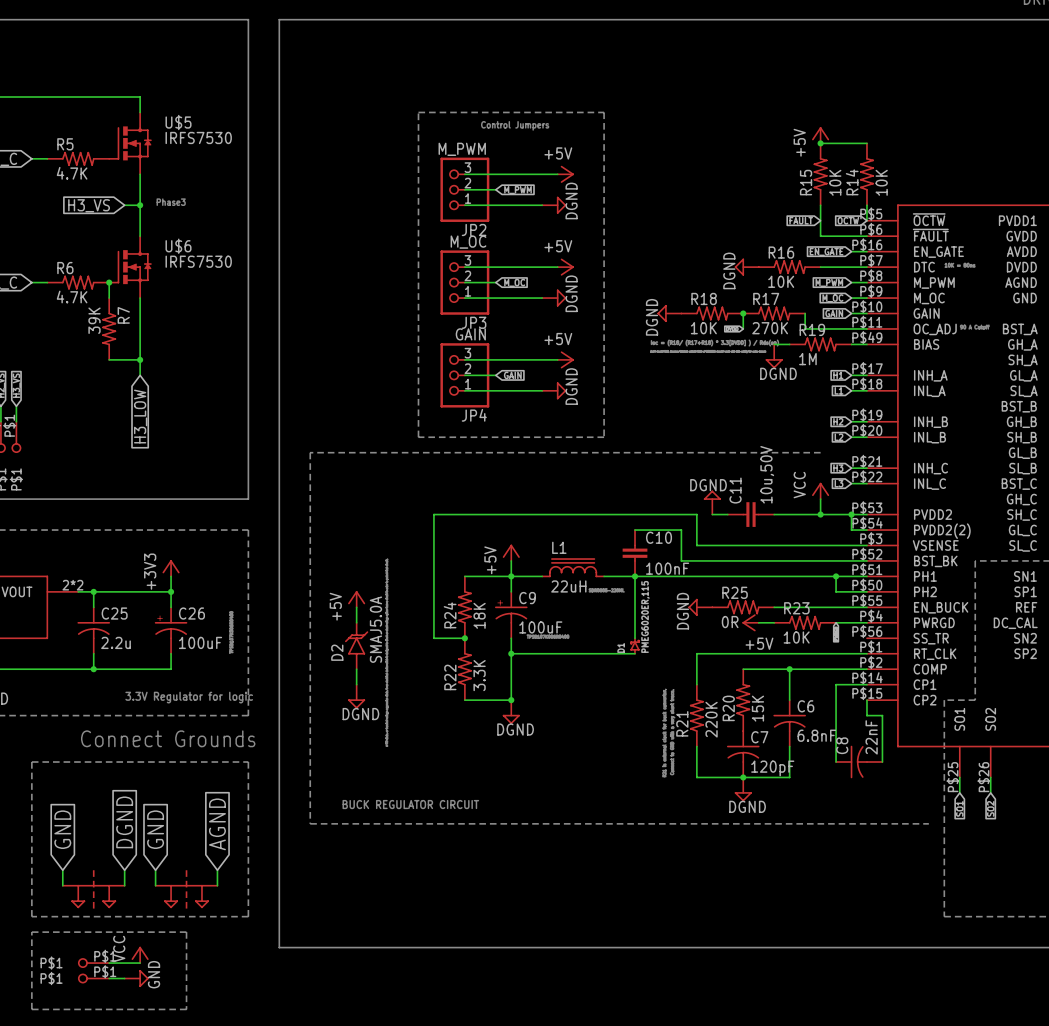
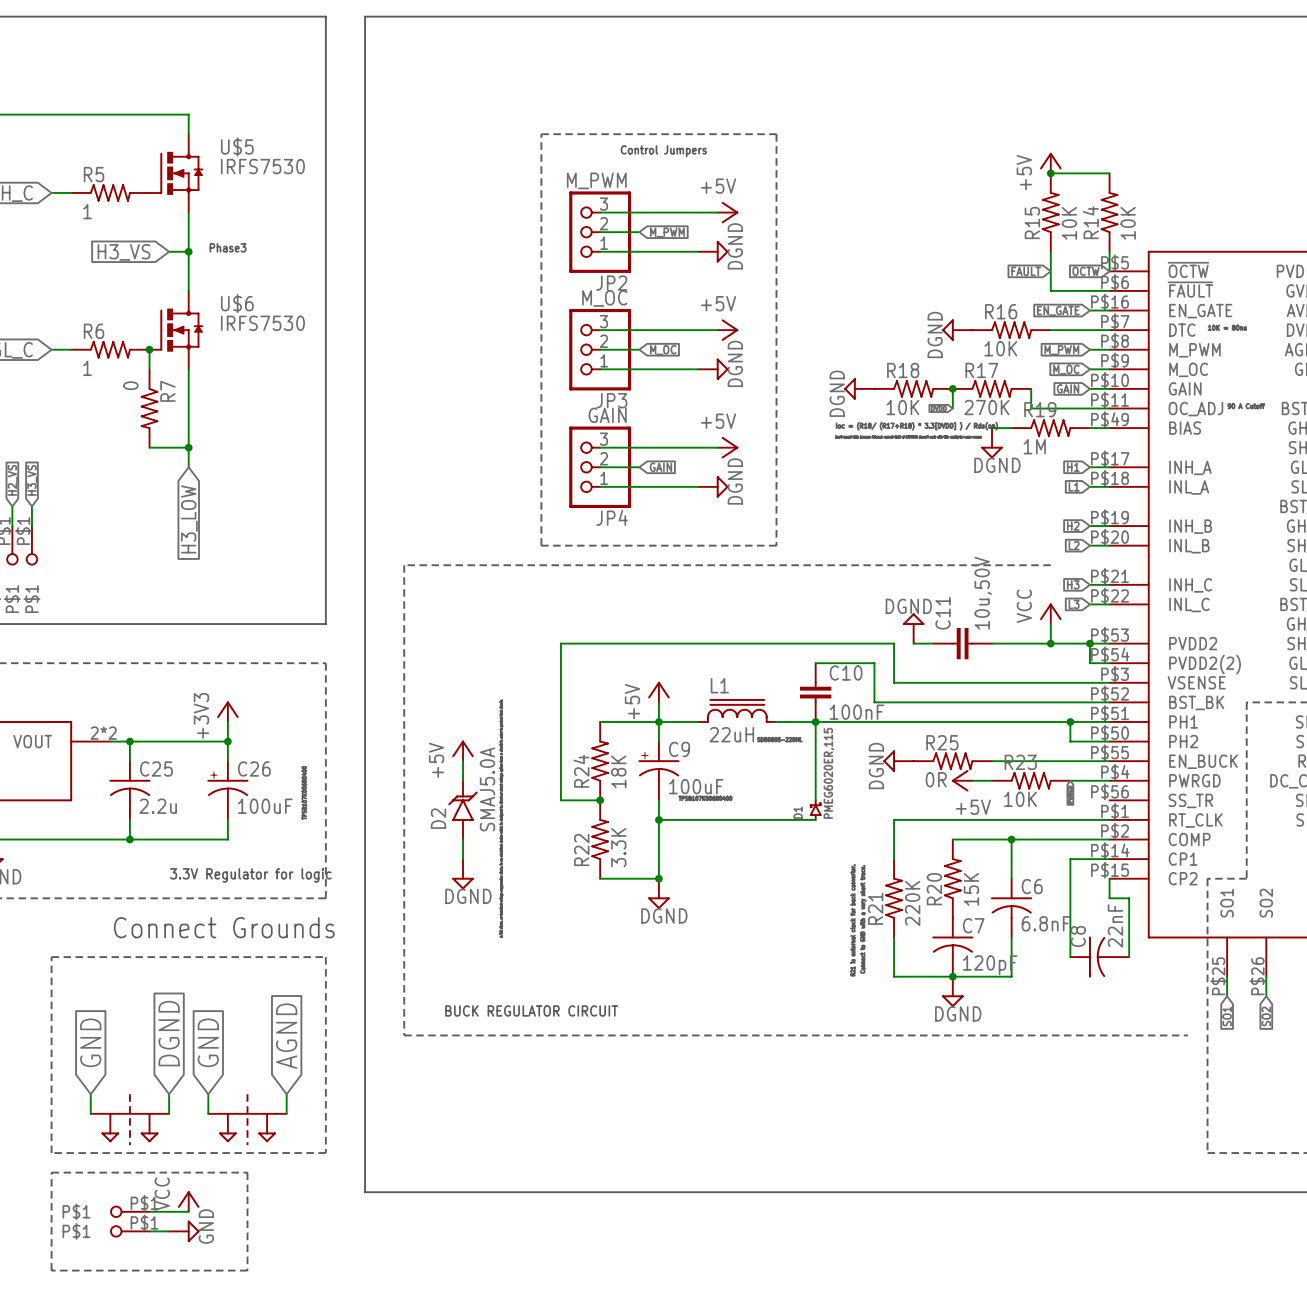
R5 value: 4.7K (72, 173) -> 1 (87, 211)
R6 value: 4.7K (72, 297) -> 1 (87, 368)
R7 value: 39K (94, 320) -> 0 (130, 385)

